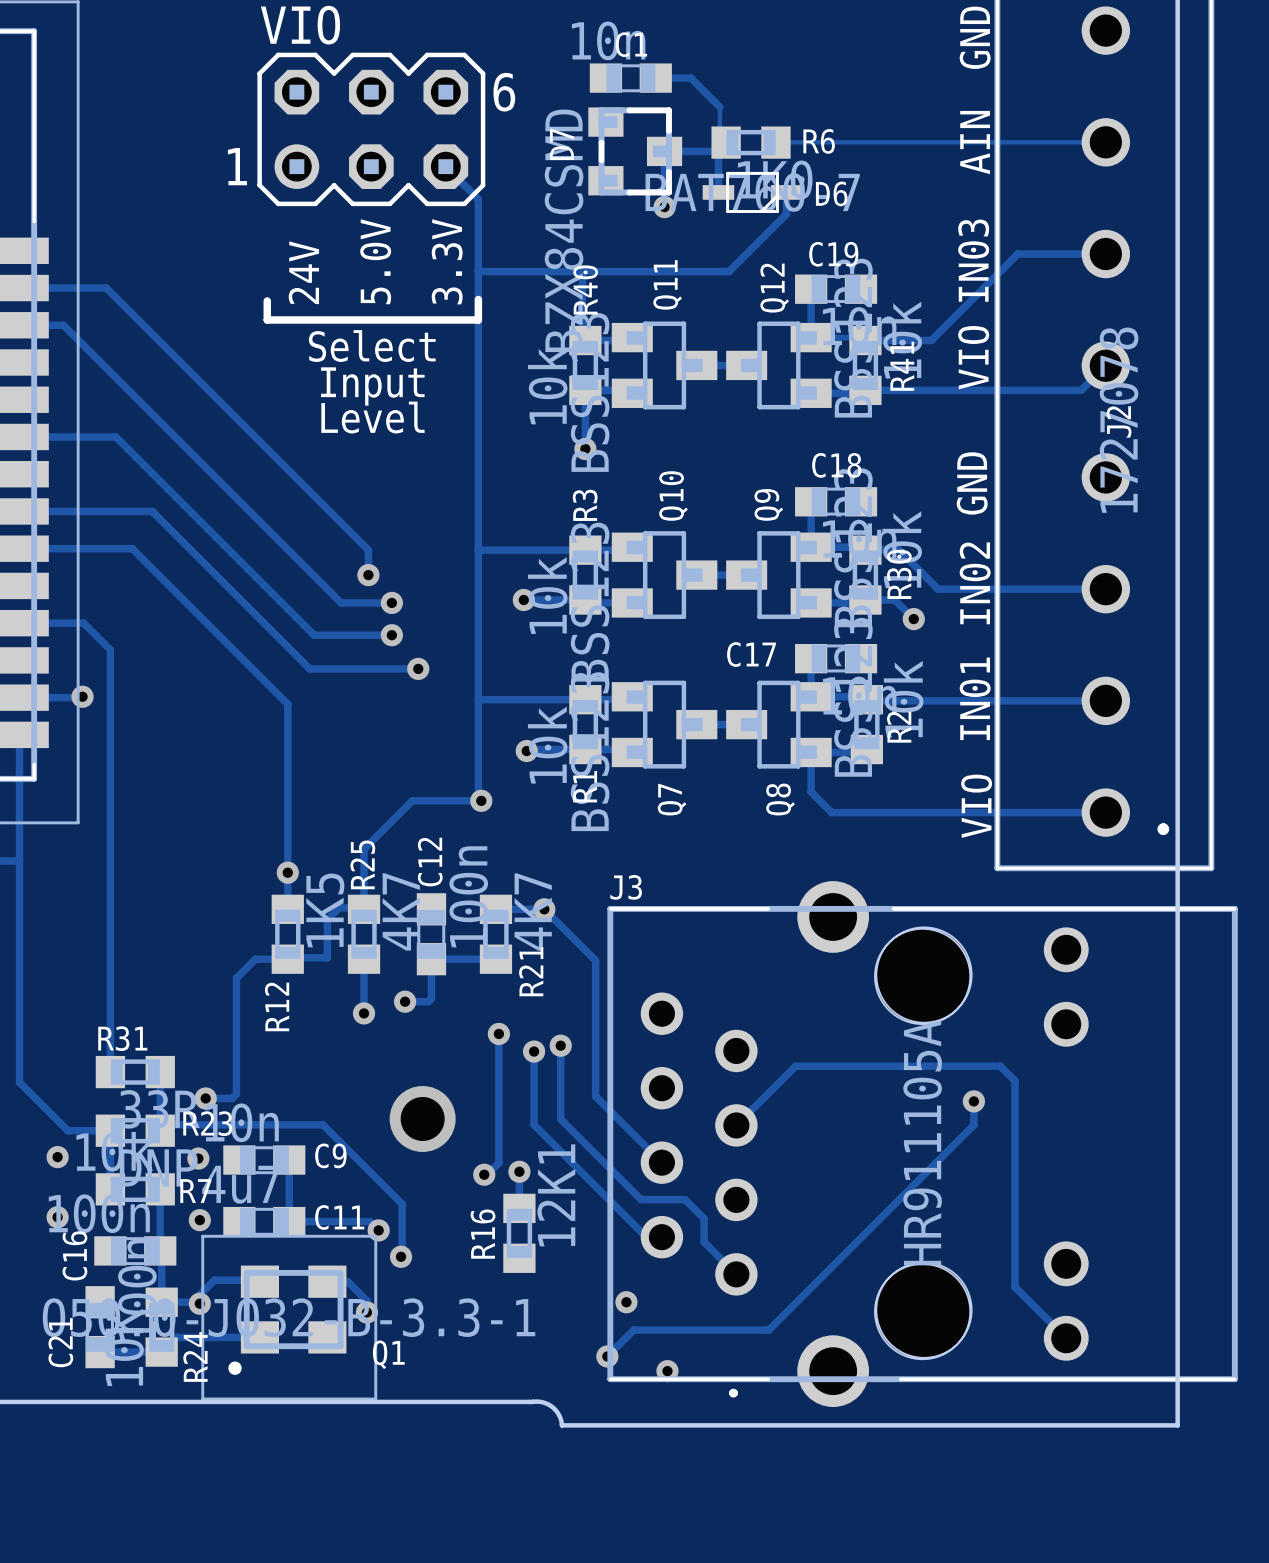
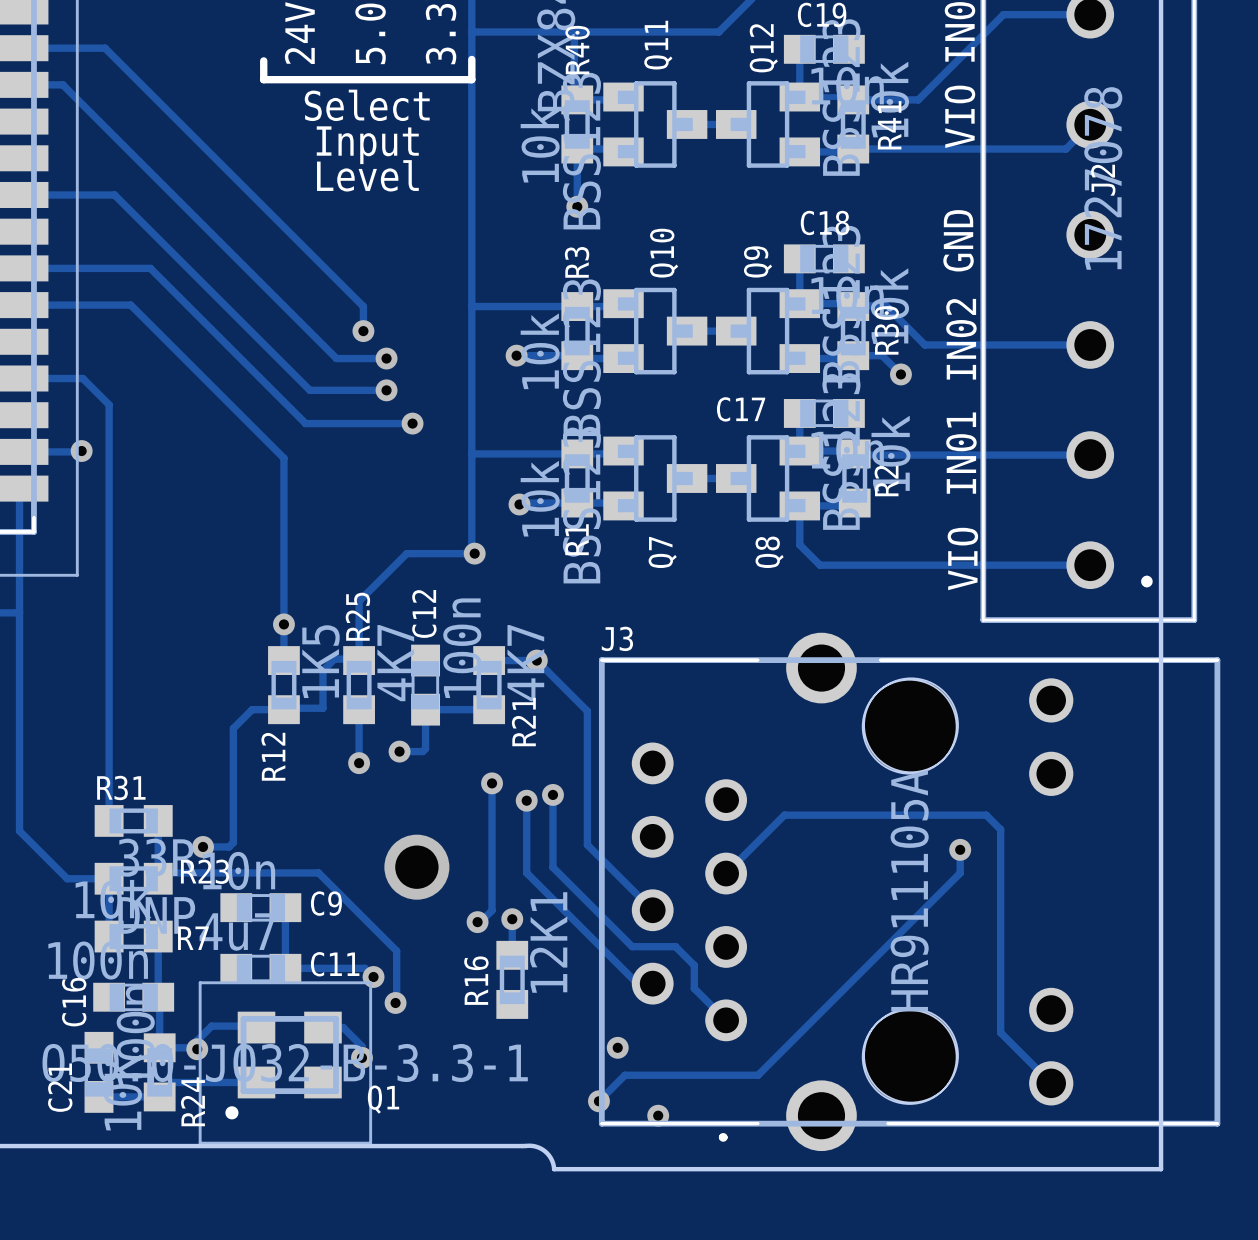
via: (57, 1157) -> none
via: (198, 1158) -> none
via: (57, 1217) -> none
via: (199, 1220) -> none

